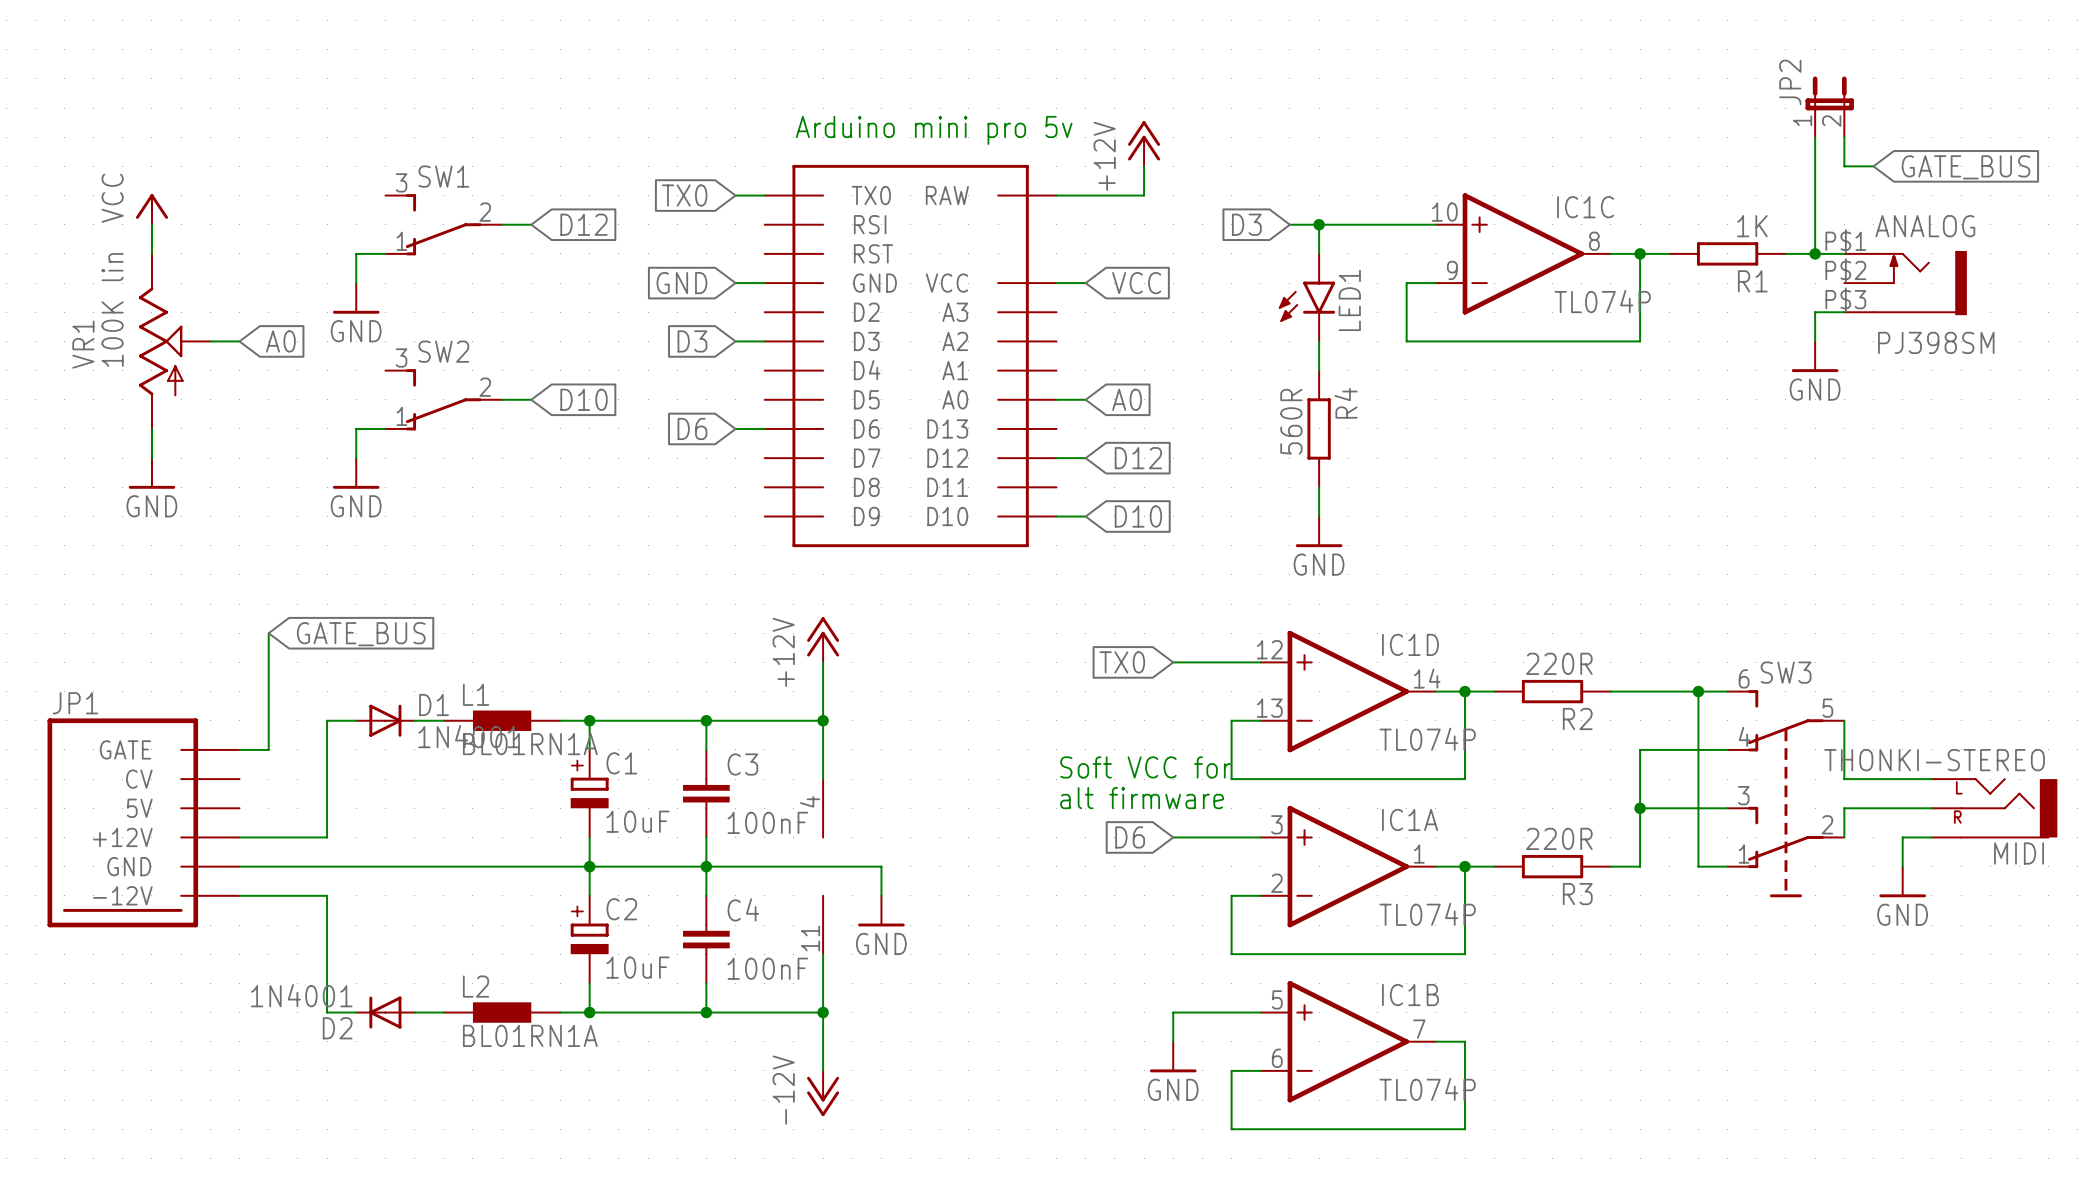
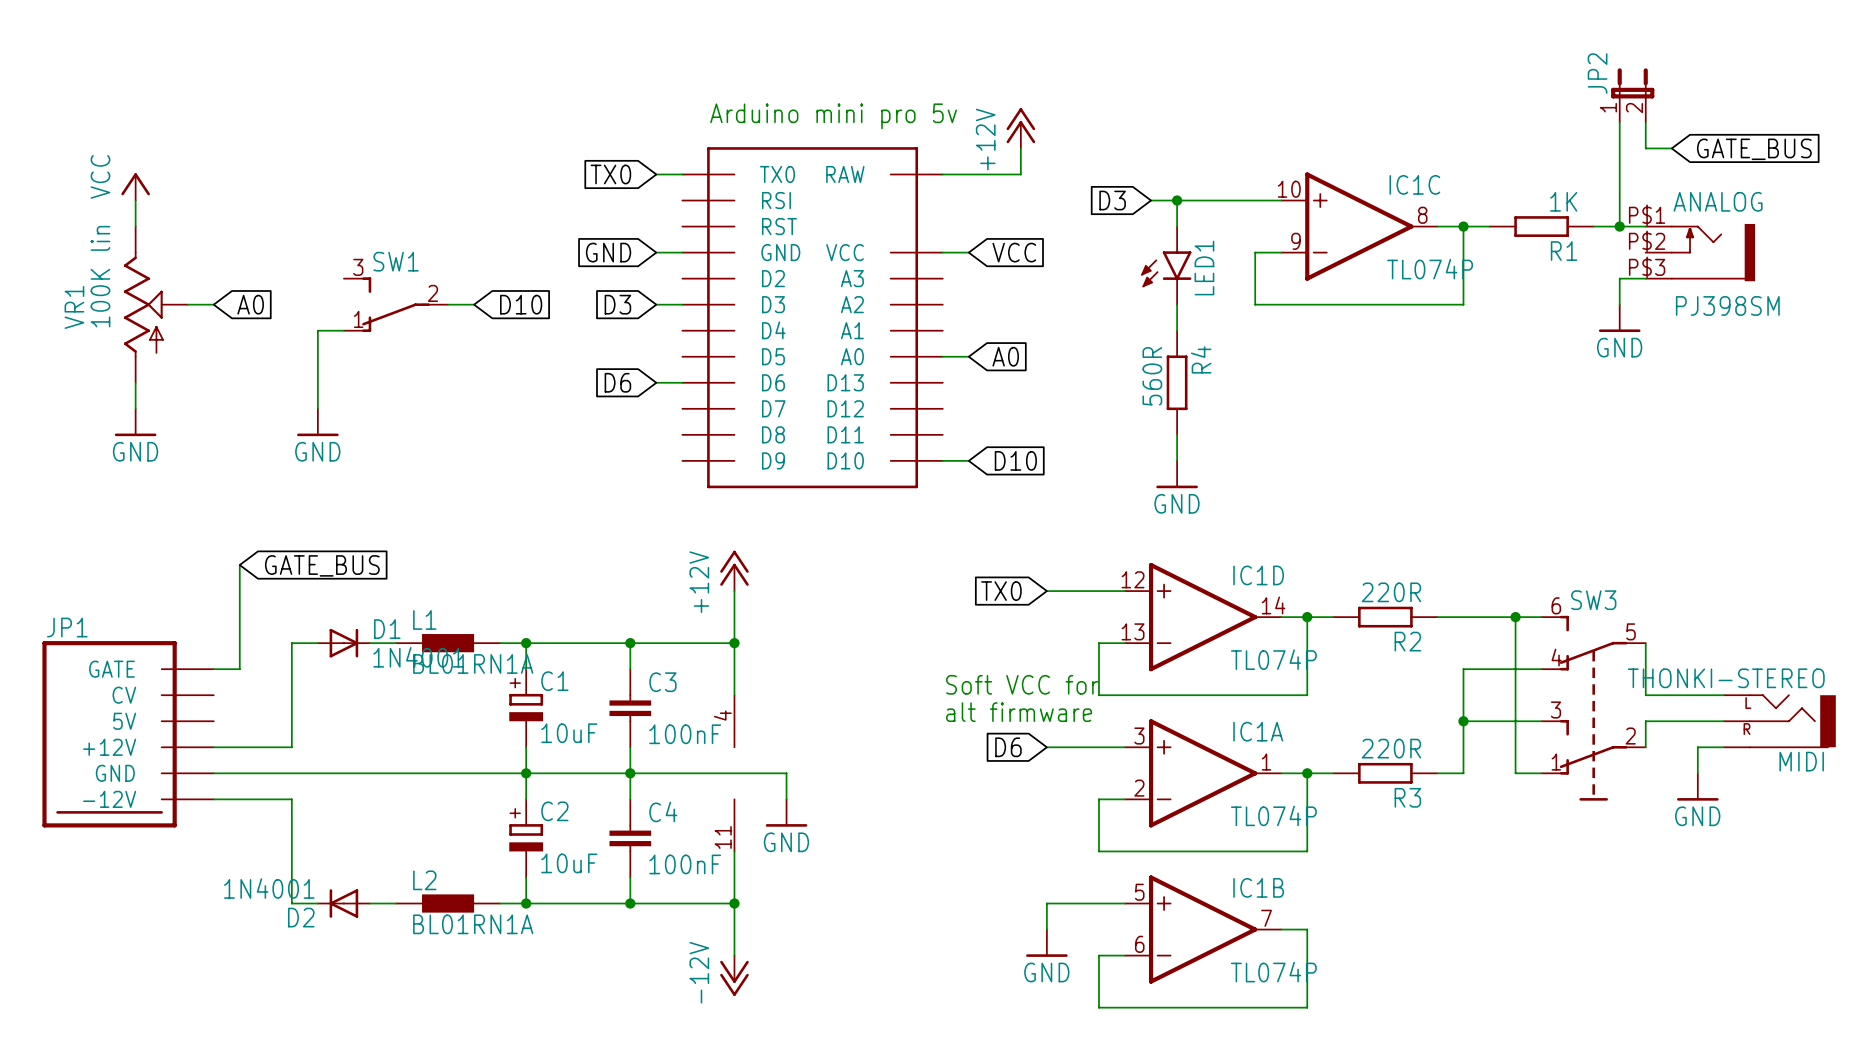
SW1 position: (443, 224) -> (395, 304)
wire: (502, 224) (531, 224) -> none
global label: D12 (584, 224) -> none
wire: (385, 253) (356, 253) (356, 283) -> none
power symbol: GND (356, 298) -> none
SW2: (443, 399) -> none
wire: (502, 399) (531, 399) -> (448, 304) (474, 304)
global label position: D10 (584, 399) -> D10 (521, 304)
wire: (356, 428) (385, 428) -> (317, 382) (317, 330) (343, 330)
wire: (1056, 458) (1085, 458) -> none
global label: D12 (1138, 458) -> none

